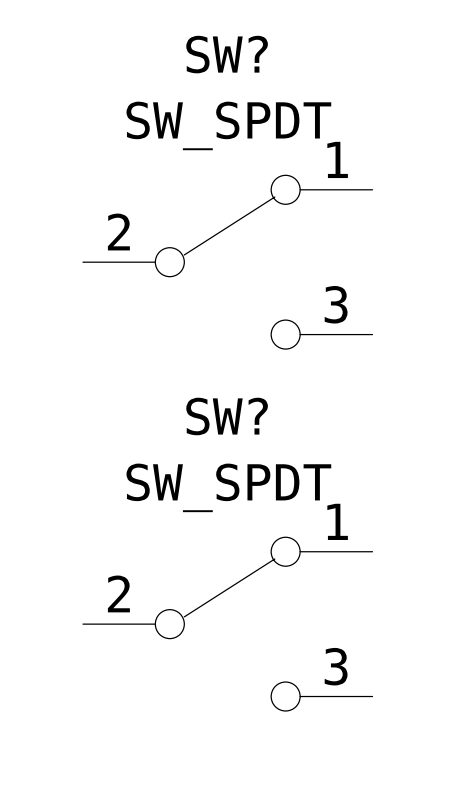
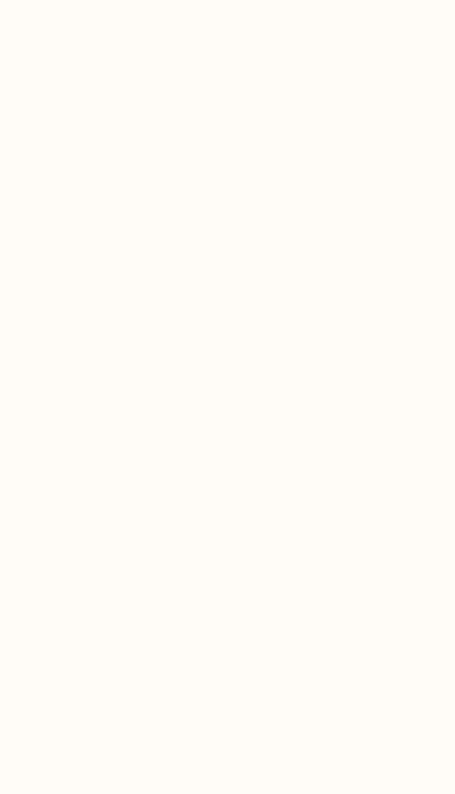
SW?: SW_SPDT (227, 262) -> none
SW?: SW_SPDT (227, 624) -> none

